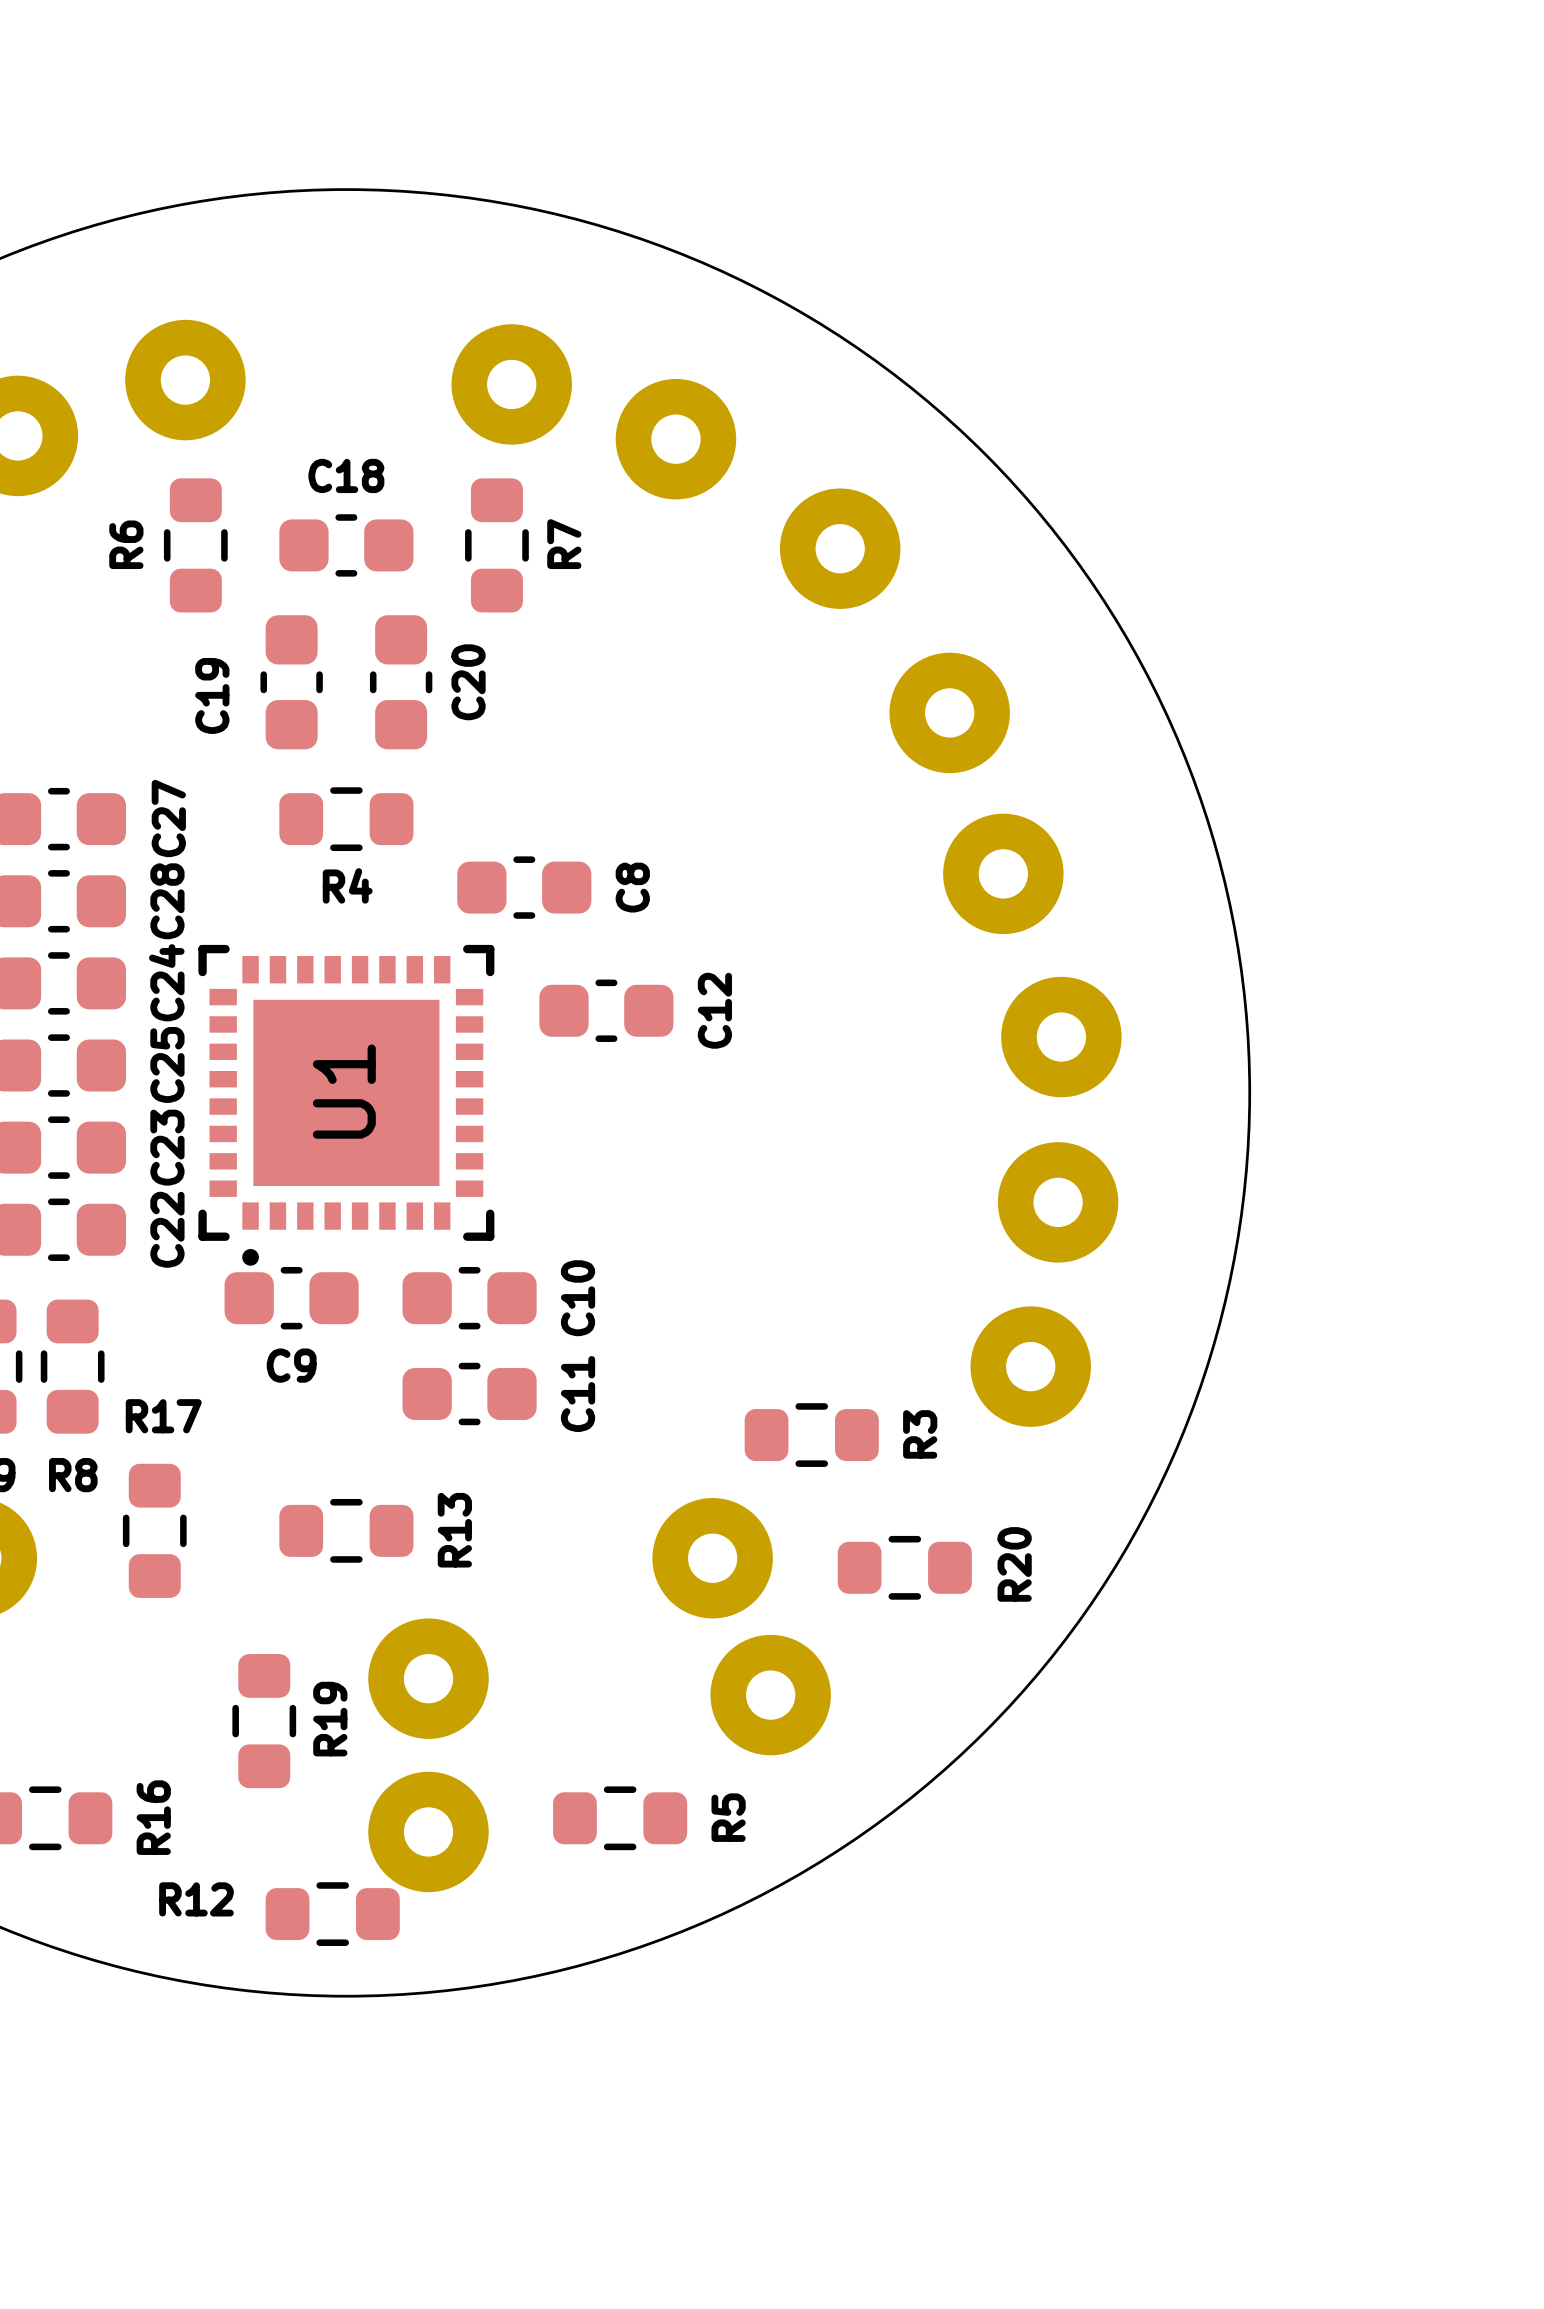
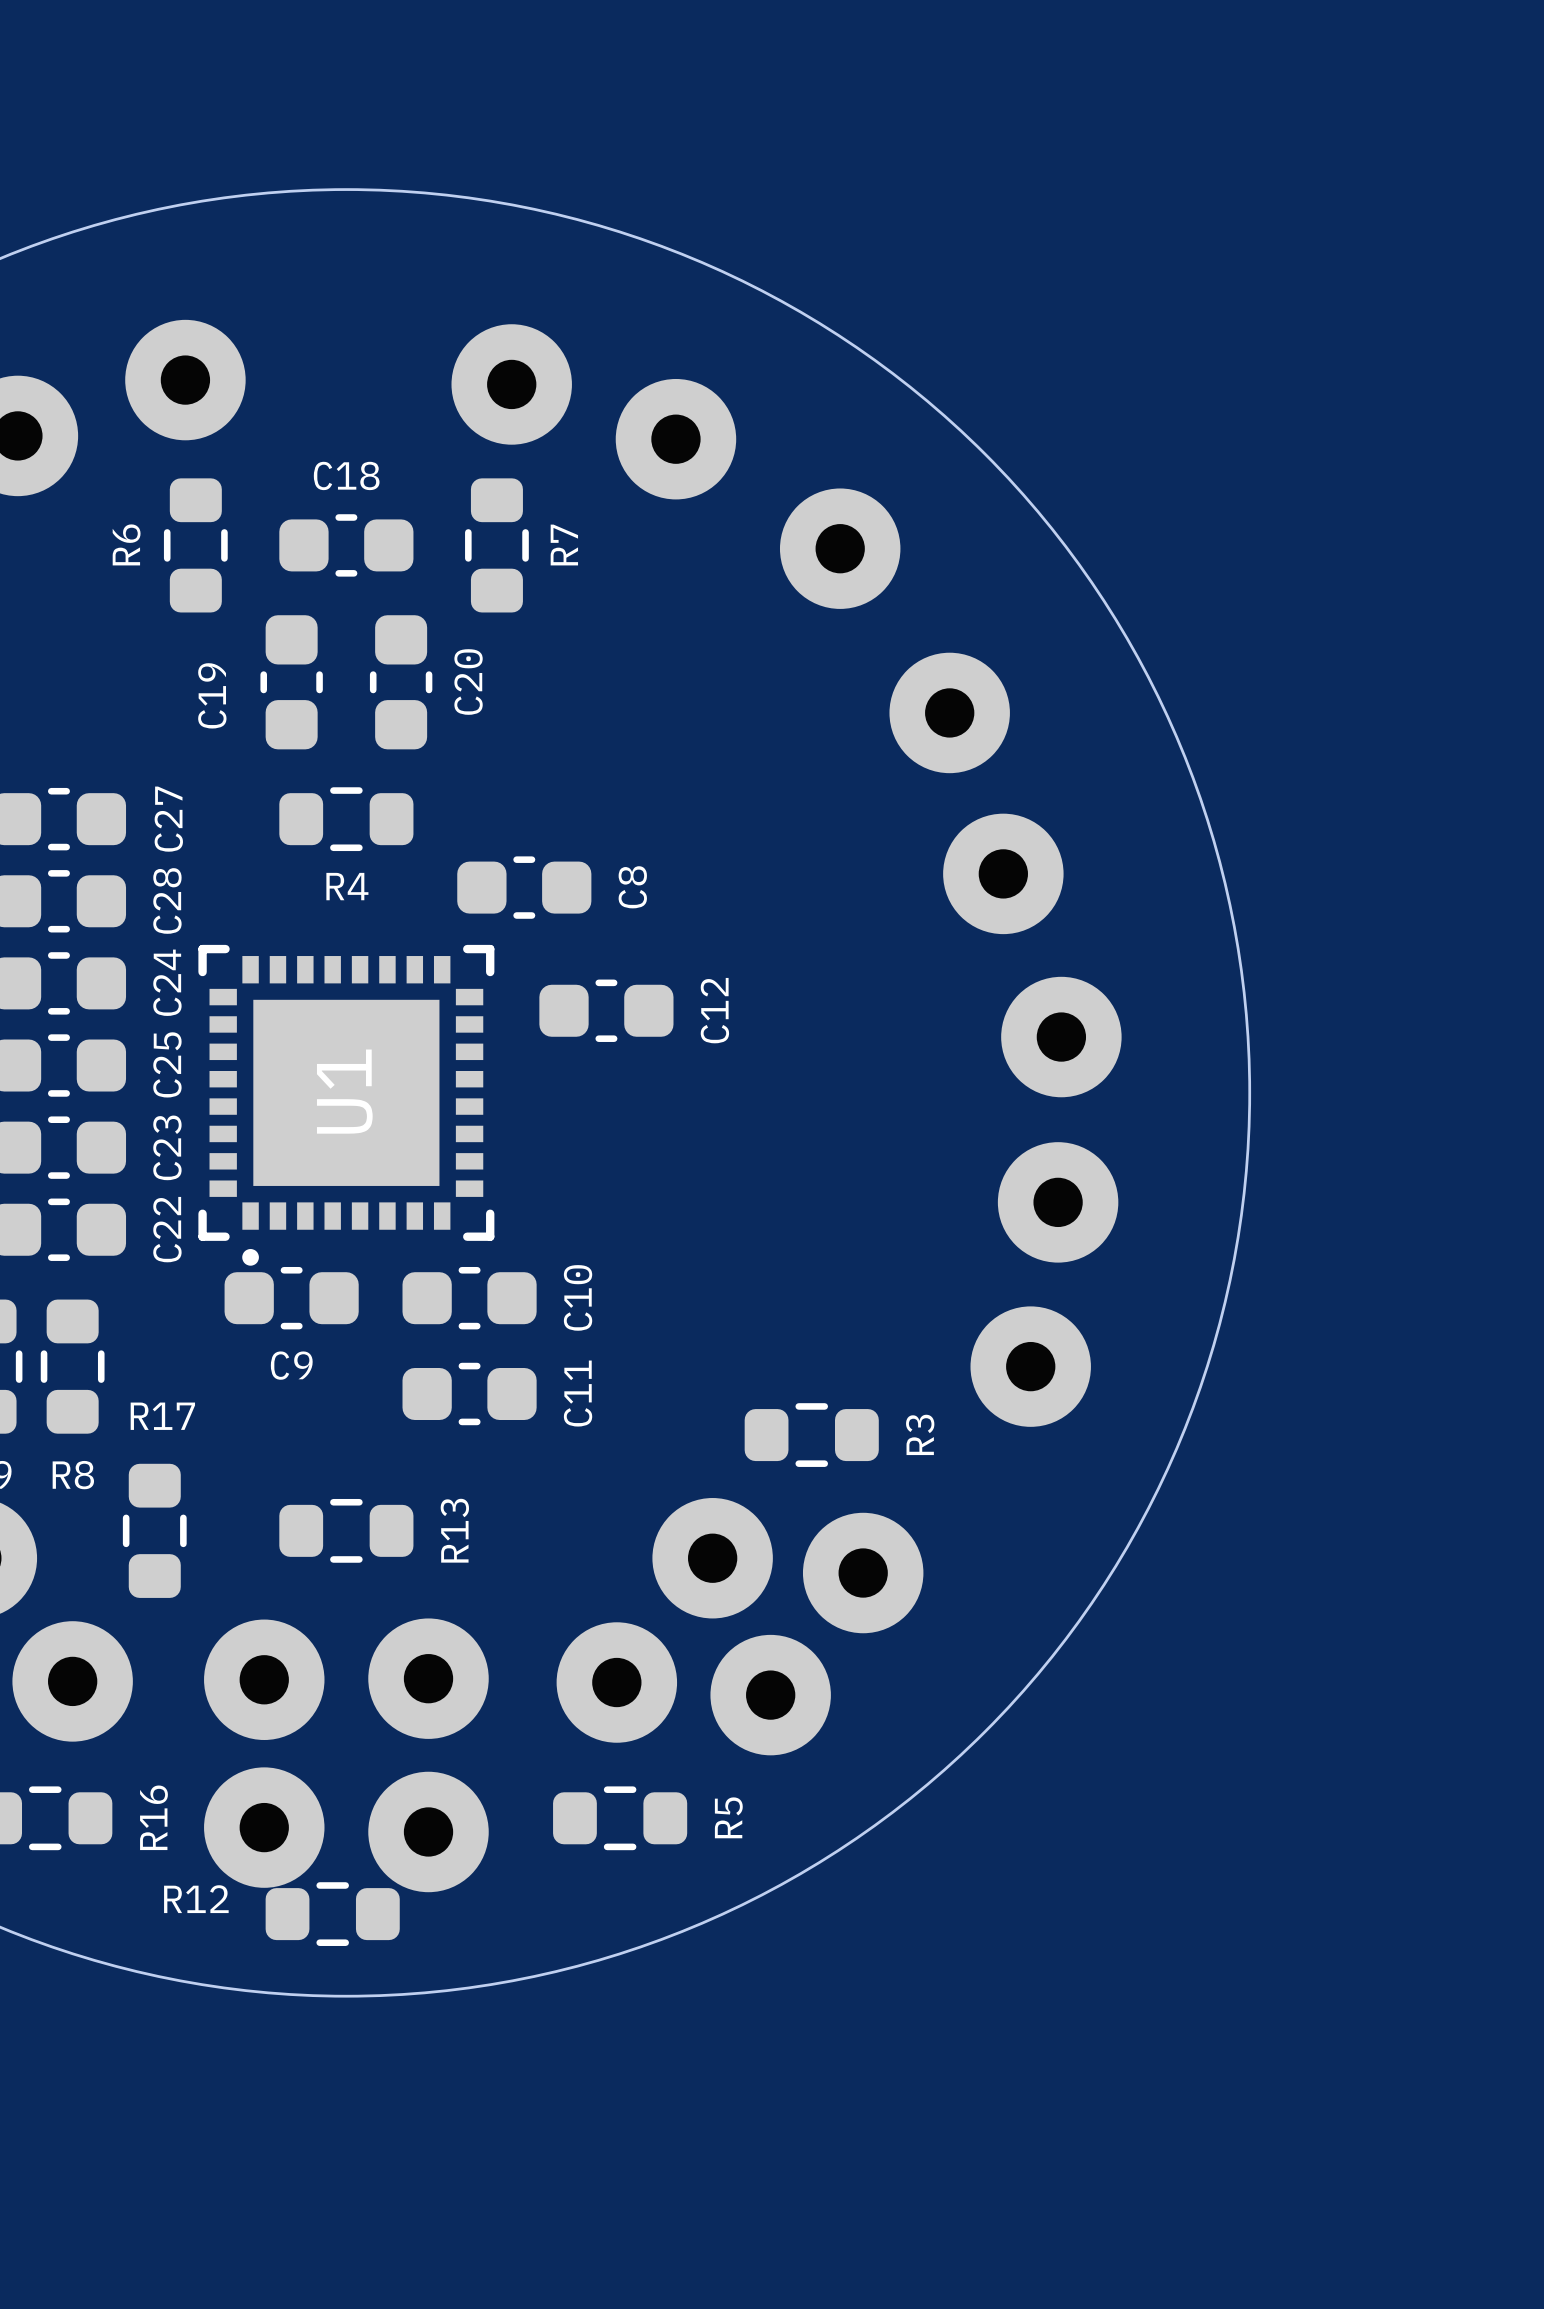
R20: (904, 1567) -> none
part: none -> (863, 1573)
part: none -> (264, 1679)
part: none -> (72, 1681)
part: none -> (616, 1682)
R19: (264, 1721) -> none
part: none -> (264, 1827)

